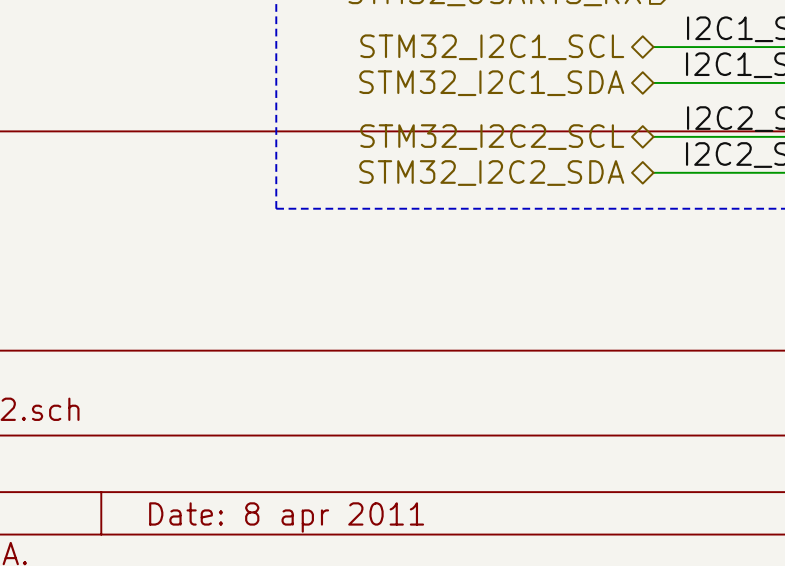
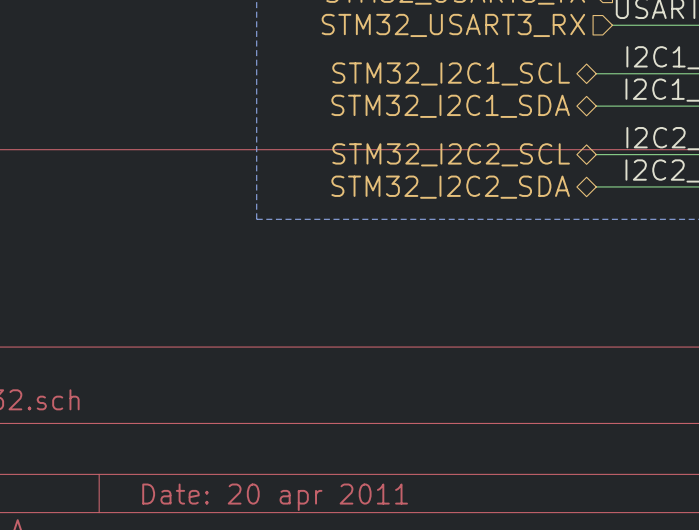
title block: Date: 8 apr 2011 (286, 517) -> Date: 20 apr 2011 (275, 497)

